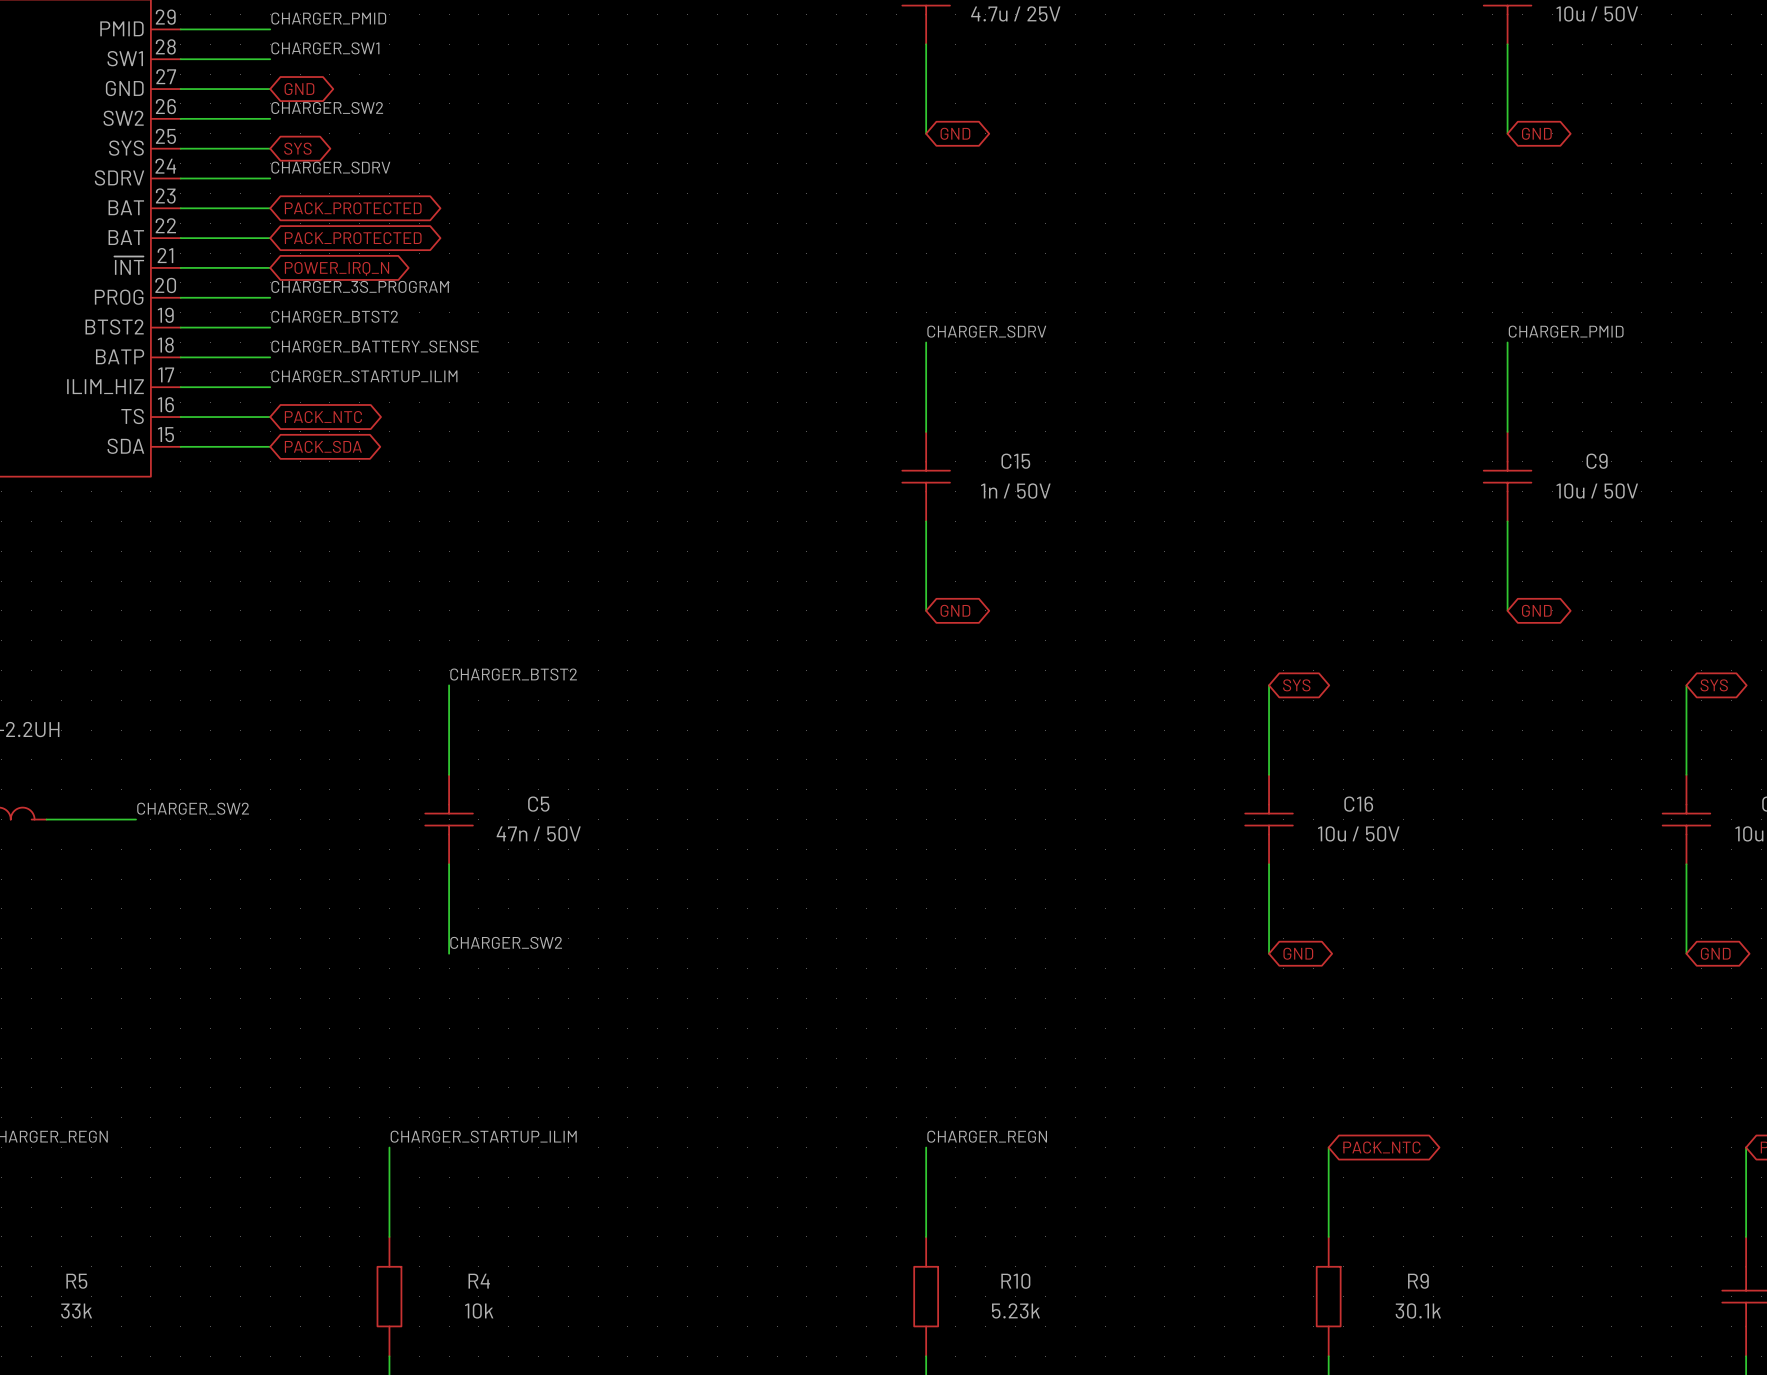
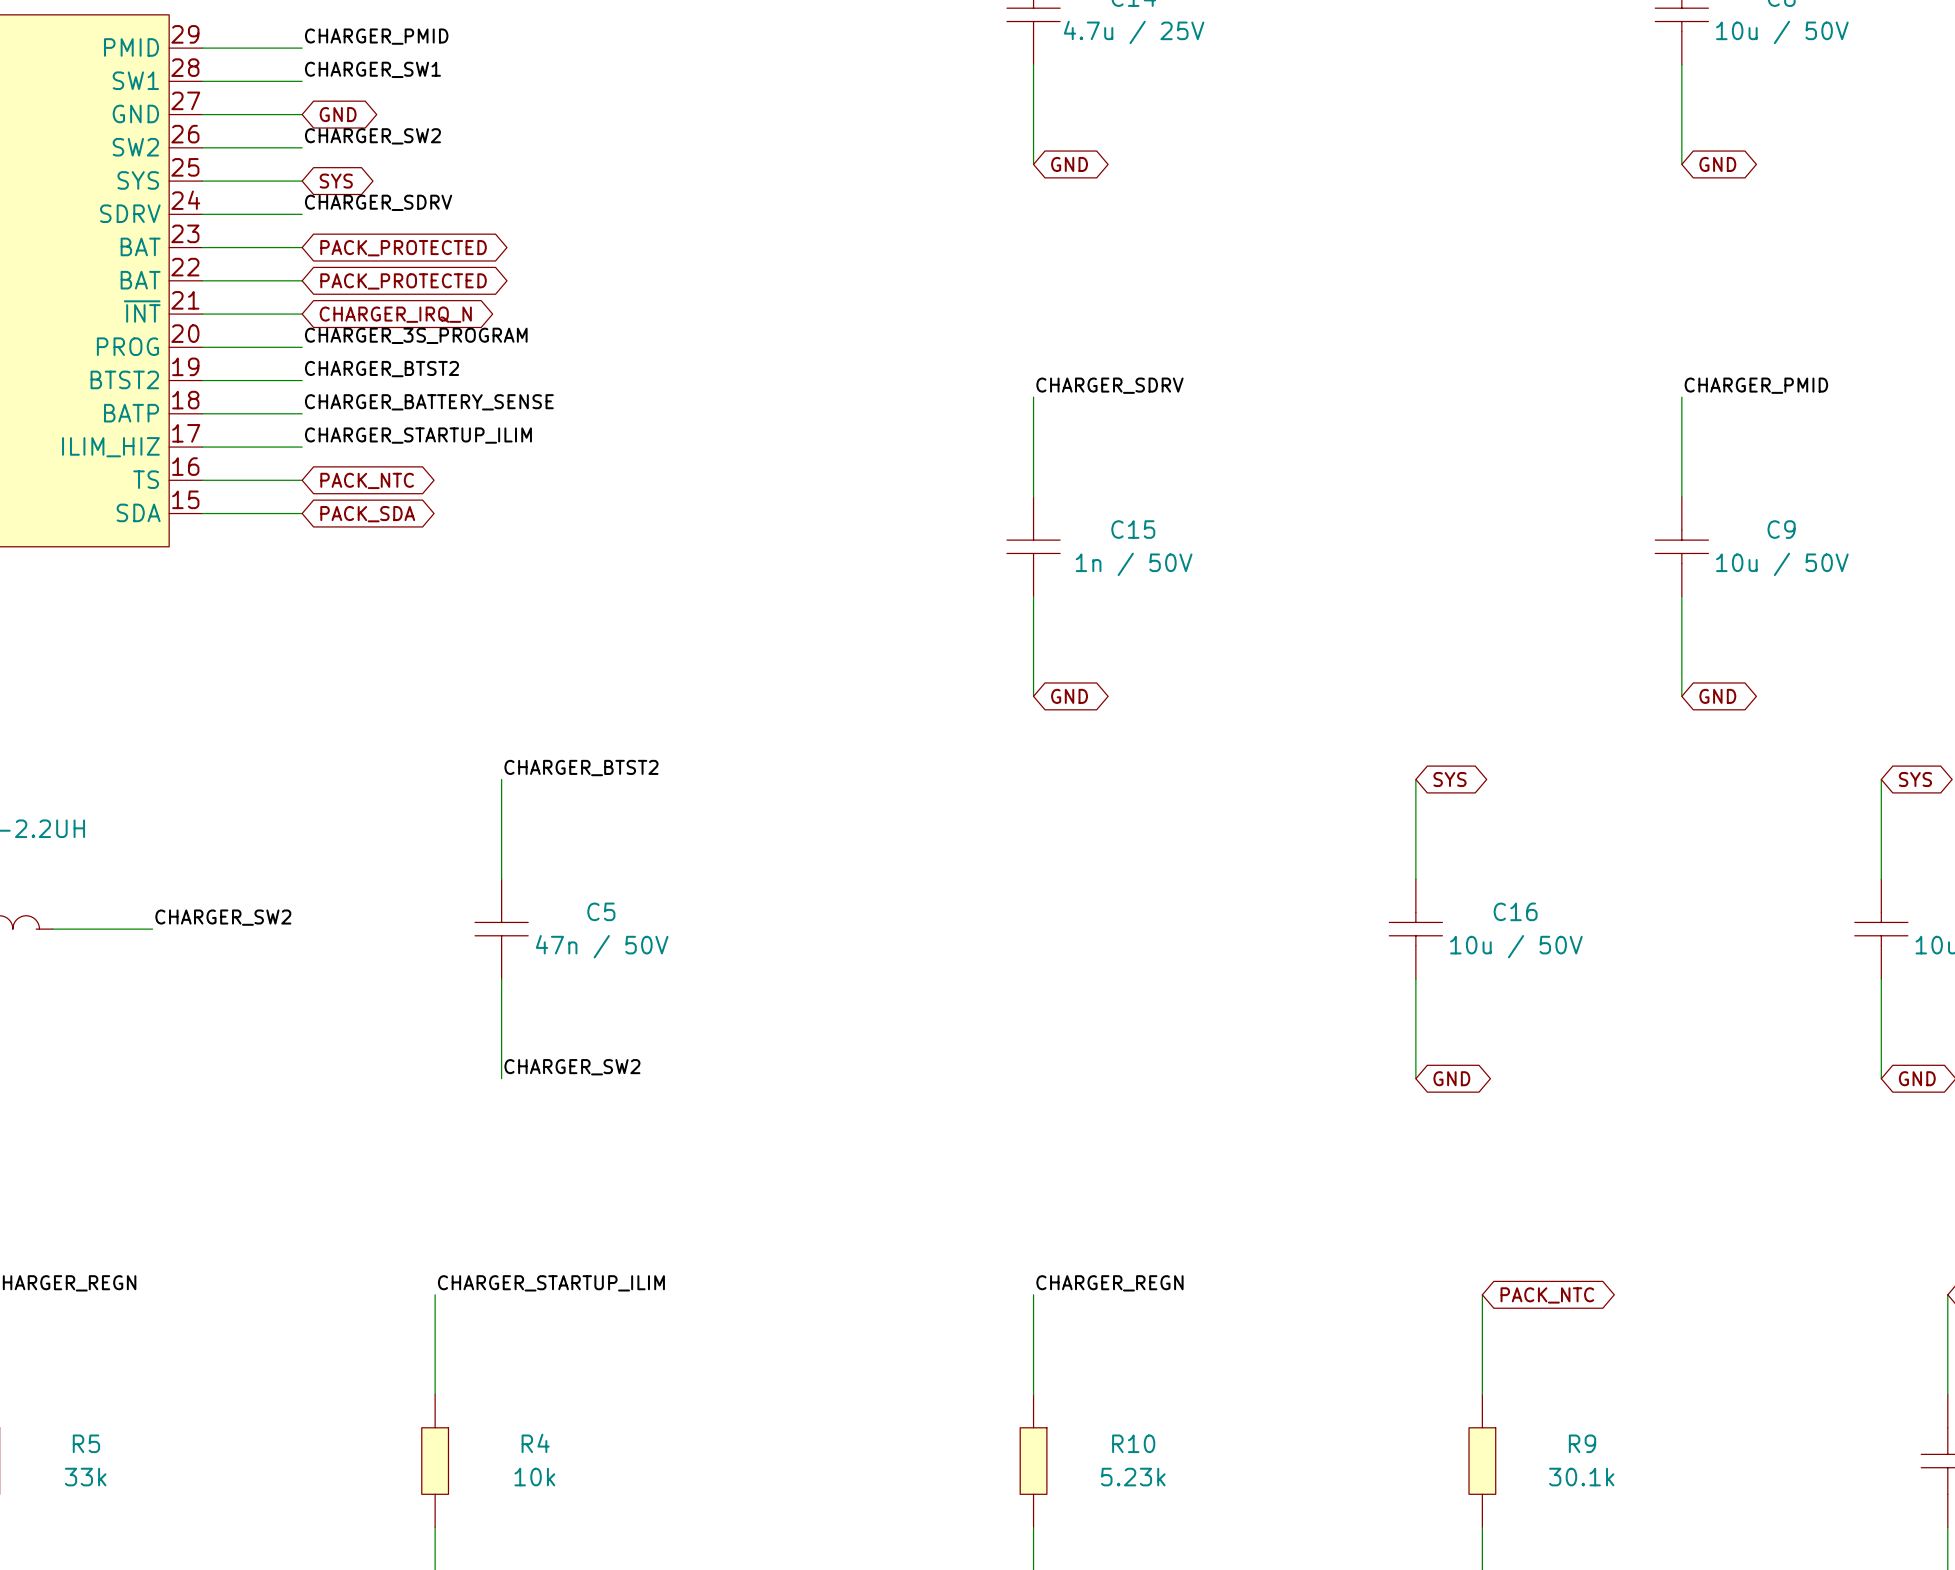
global label: POWER_IRQ_N (337, 268) -> CHARGER_IRQ_N (395, 314)

